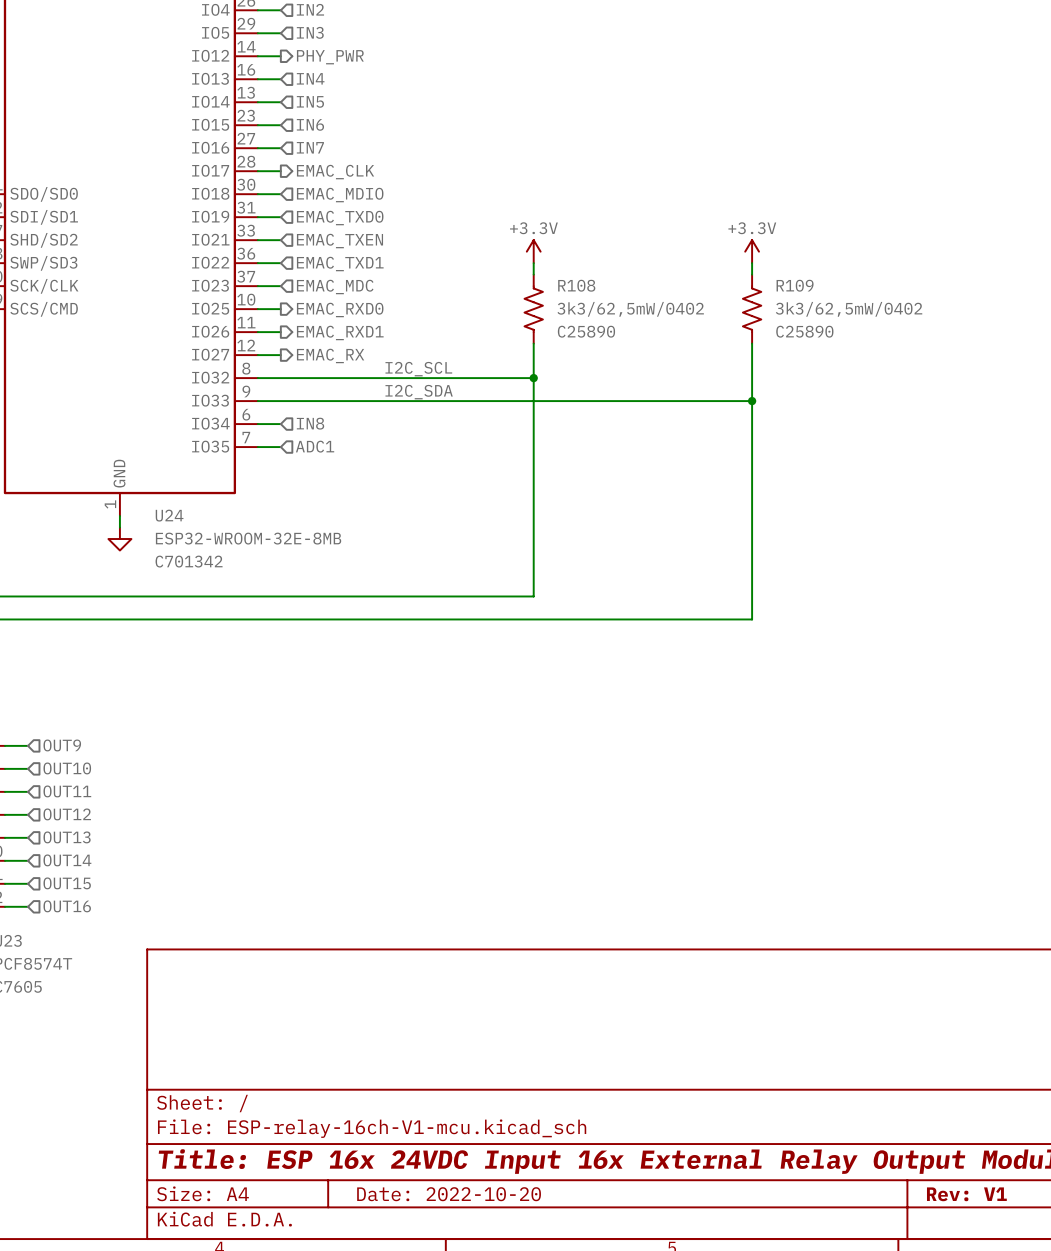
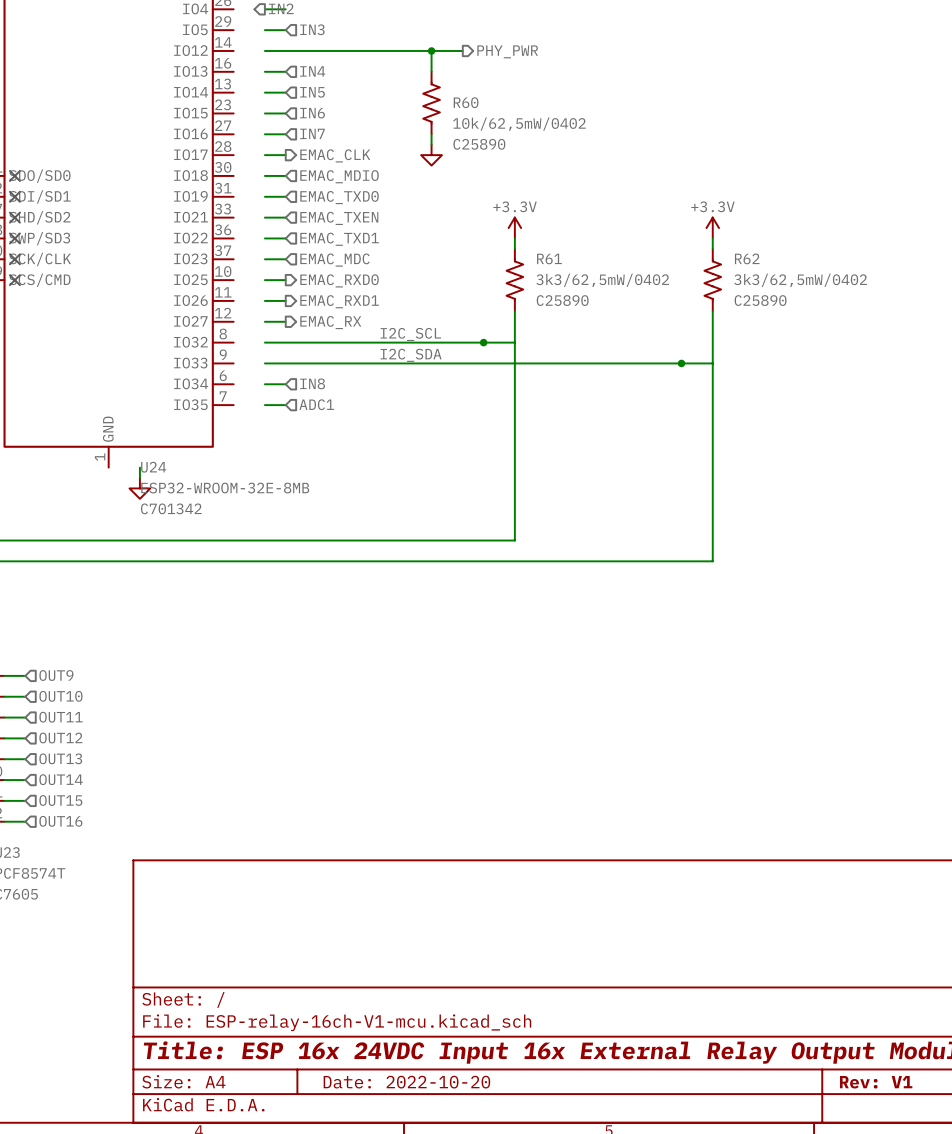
wire: (257, 10) (280, 10) -> (264, 9) (285, 9)
hierarchical label position: IN3 (310, 32) -> IN3 (312, 29)
wire: (257, 33) (280, 33) -> (264, 30) (285, 30)
wire: (257, 56) (280, 56) -> none
wire: none -> (264, 50) (462, 50)
wire: none -> (431, 50) (431, 71)
junction: none -> (431, 50)
hierarchical label: PHY_PWR (330, 57) -> none
hierarchical label: none -> PHY_PWR (507, 51)
hierarchical label position: IN4 (310, 78) -> IN4 (312, 71)
wire: (257, 79) (280, 79) -> (264, 71) (285, 71)
hierarchical label position: IN5 (310, 101) -> IN5 (312, 92)
wire: (257, 102) (280, 102) -> (264, 92) (285, 92)
R60: none -> 10k/62,5mW/0402 (431, 103)
hierarchical label position: IN6 (310, 124) -> IN6 (312, 113)
wire: (257, 125) (280, 125) -> (264, 113) (285, 113)
hierarchical label position: IN7 (310, 147) -> IN7 (312, 133)
wire: (257, 148) (280, 148) -> (264, 134) (285, 134)
wire: none -> (431, 134) (431, 144)
wire: (257, 171) (280, 171) -> (264, 155) (285, 155)
power symbol: none -> (431, 155)
hierarchical label position: EMAC_CLK (335, 172) -> EMAC_CLK (335, 155)
no-connect mark: none -> (14, 175)
wire: (257, 194) (280, 194) -> (264, 175) (285, 175)
hierarchical label position: EMAC_MDIO (340, 195) -> EMAC_MDIO (339, 176)
no-connect mark: none -> (14, 196)
wire: (257, 217) (280, 217) -> (264, 196) (285, 196)
hierarchical label position: EMAC_TXD0 (340, 218) -> EMAC_TXD0 (339, 197)
no-connect mark: none -> (14, 217)
wire: (257, 240) (280, 240) -> (264, 217) (285, 217)
hierarchical label position: EMAC_TXEN (339, 241) -> EMAC_TXEN (339, 218)
power symbol position: +3.3V (533, 251) -> +3.3V (514, 228)
power symbol position: +3.3V (752, 251) -> +3.3V (712, 228)
no-connect mark: none -> (14, 238)
wire: (257, 263) (280, 263) -> (264, 238) (285, 238)
wire: (533, 263) (533, 274) -> (514, 238) (514, 248)
wire: (752, 263) (752, 274) -> (712, 238) (712, 248)
hierarchical label position: EMAC_TXD1 (340, 264) -> EMAC_TXD1 (339, 239)
no-connect mark: none -> (14, 259)
wire: (257, 286) (280, 286) -> (264, 259) (285, 259)
hierarchical label position: EMAC_MDC (335, 287) -> EMAC_MDC (334, 260)
no-connect mark: none -> (14, 280)
wire: (257, 309) (280, 309) -> (264, 280) (285, 280)
hierarchical label position: EMAC_RXD0 (340, 309) -> EMAC_RXD0 (339, 280)
R108: 3k3/62,5mW/0402 (533, 309) -> none
R61: none -> 3k3/62,5mW/0402 (514, 280)
R109: 3k3/62,5mW/0402 (752, 309) -> none
R62: none -> 3k3/62,5mW/0402 (712, 280)
wire: (257, 332) (280, 332) -> (264, 300) (285, 300)
hierarchical label position: EMAC_RXD1 (340, 332) -> EMAC_RXD1 (339, 301)
wire: (533, 343) (533, 596) -> (514, 311) (514, 540) (483, 540)
wire: (752, 343) (752, 619) -> (712, 311) (712, 561) (681, 561)
wire: (257, 355) (280, 355) -> (264, 321) (285, 321)
hierarchical label position: EMAC_RX (330, 355) -> EMAC_RX (330, 322)
label position: I2C_SCL (418, 369) -> I2C_SCL (410, 334)
wire: (257, 378) (292, 378) -> none
wire: none -> (483, 342) (514, 342)
label position: I2C_SDA (419, 392) -> I2C_SDA (411, 355)
wire: (257, 401) (292, 401) -> none
wire: none -> (681, 363) (712, 363)
hierarchical label position: IN8 (310, 423) -> IN8 (312, 383)
wire: (257, 424) (280, 424) -> (264, 384) (285, 384)
hierarchical label position: ADC1 (315, 446) -> ADC1 (316, 404)
wire: (257, 447) (280, 447) -> (264, 405) (285, 405)
wire: (119, 516) (119, 527) -> (139, 467) (139, 478)
power symbol position: (119, 539) -> (139, 488)

